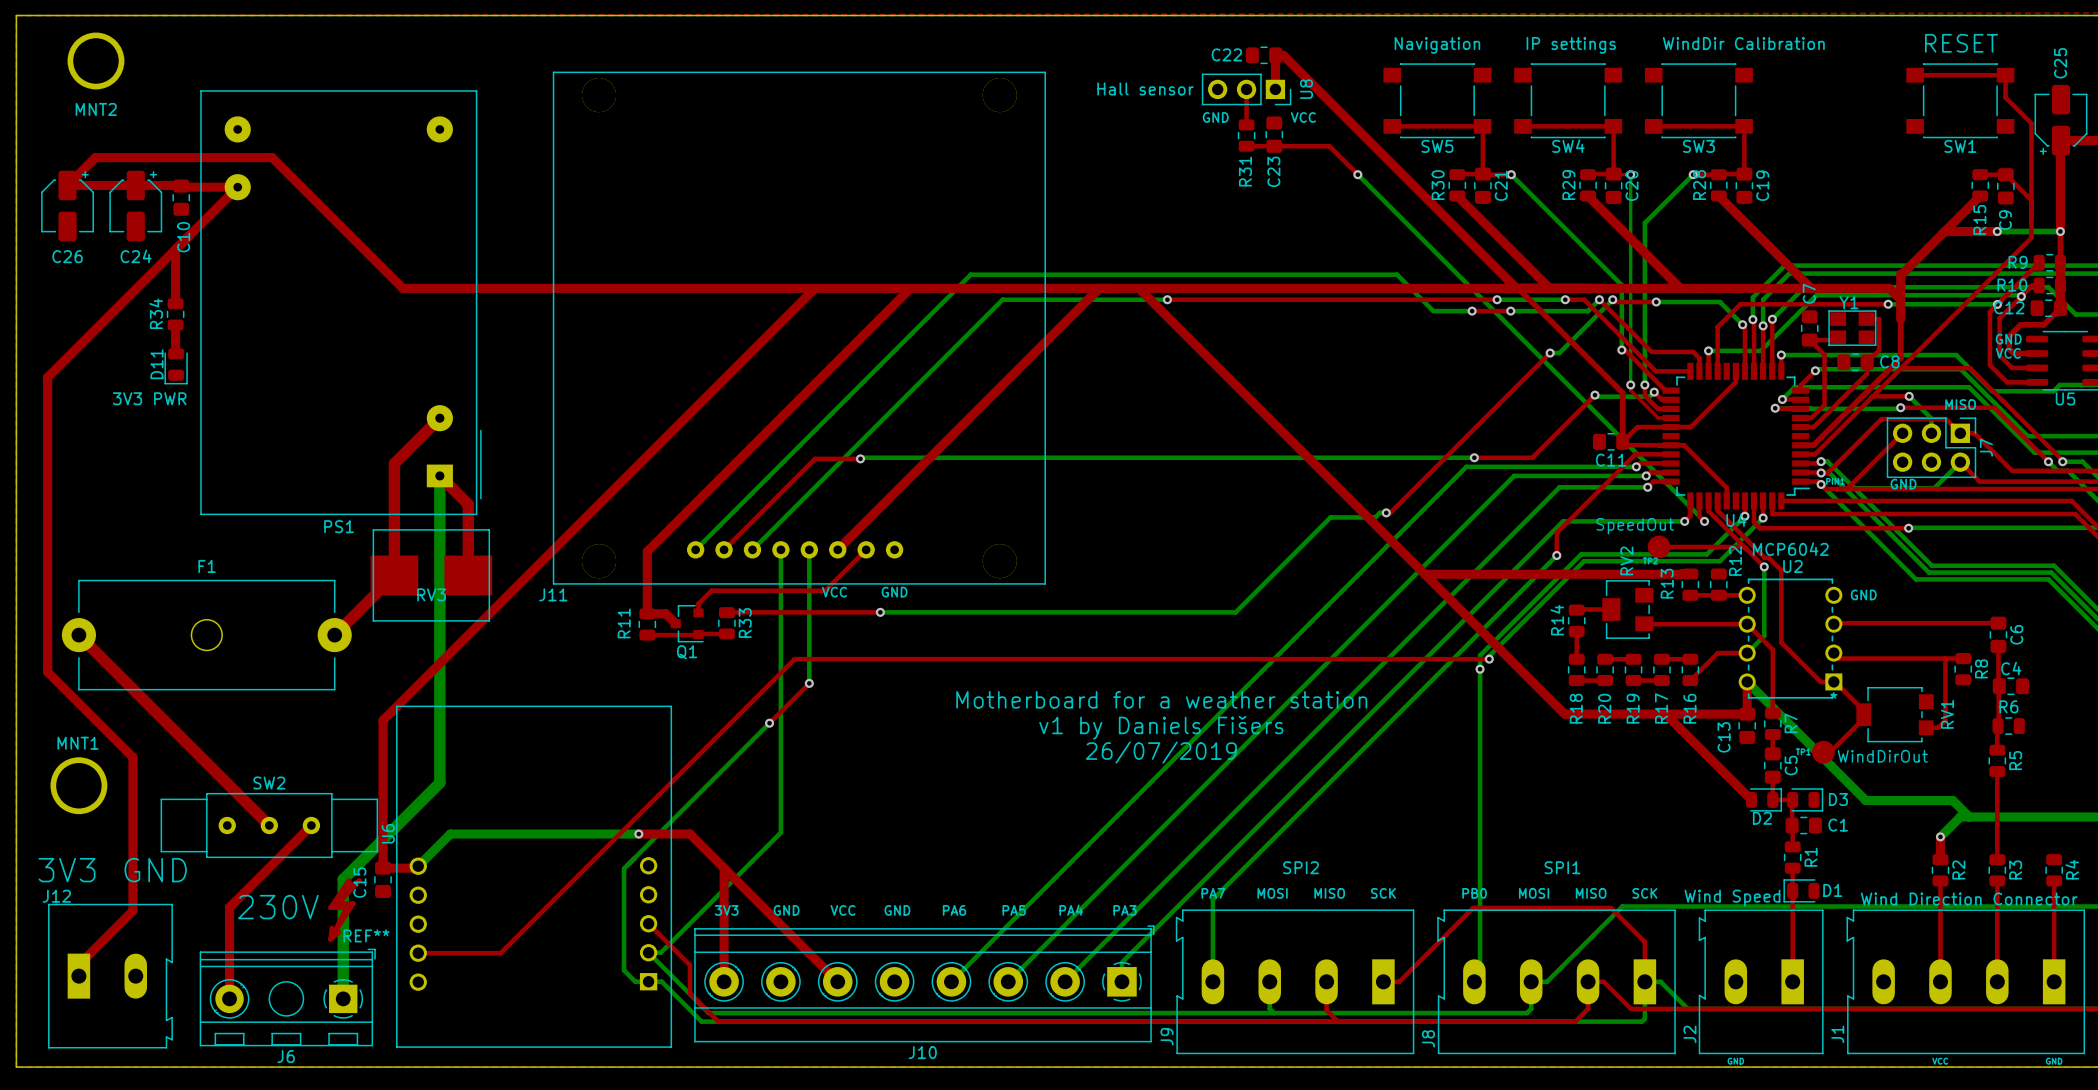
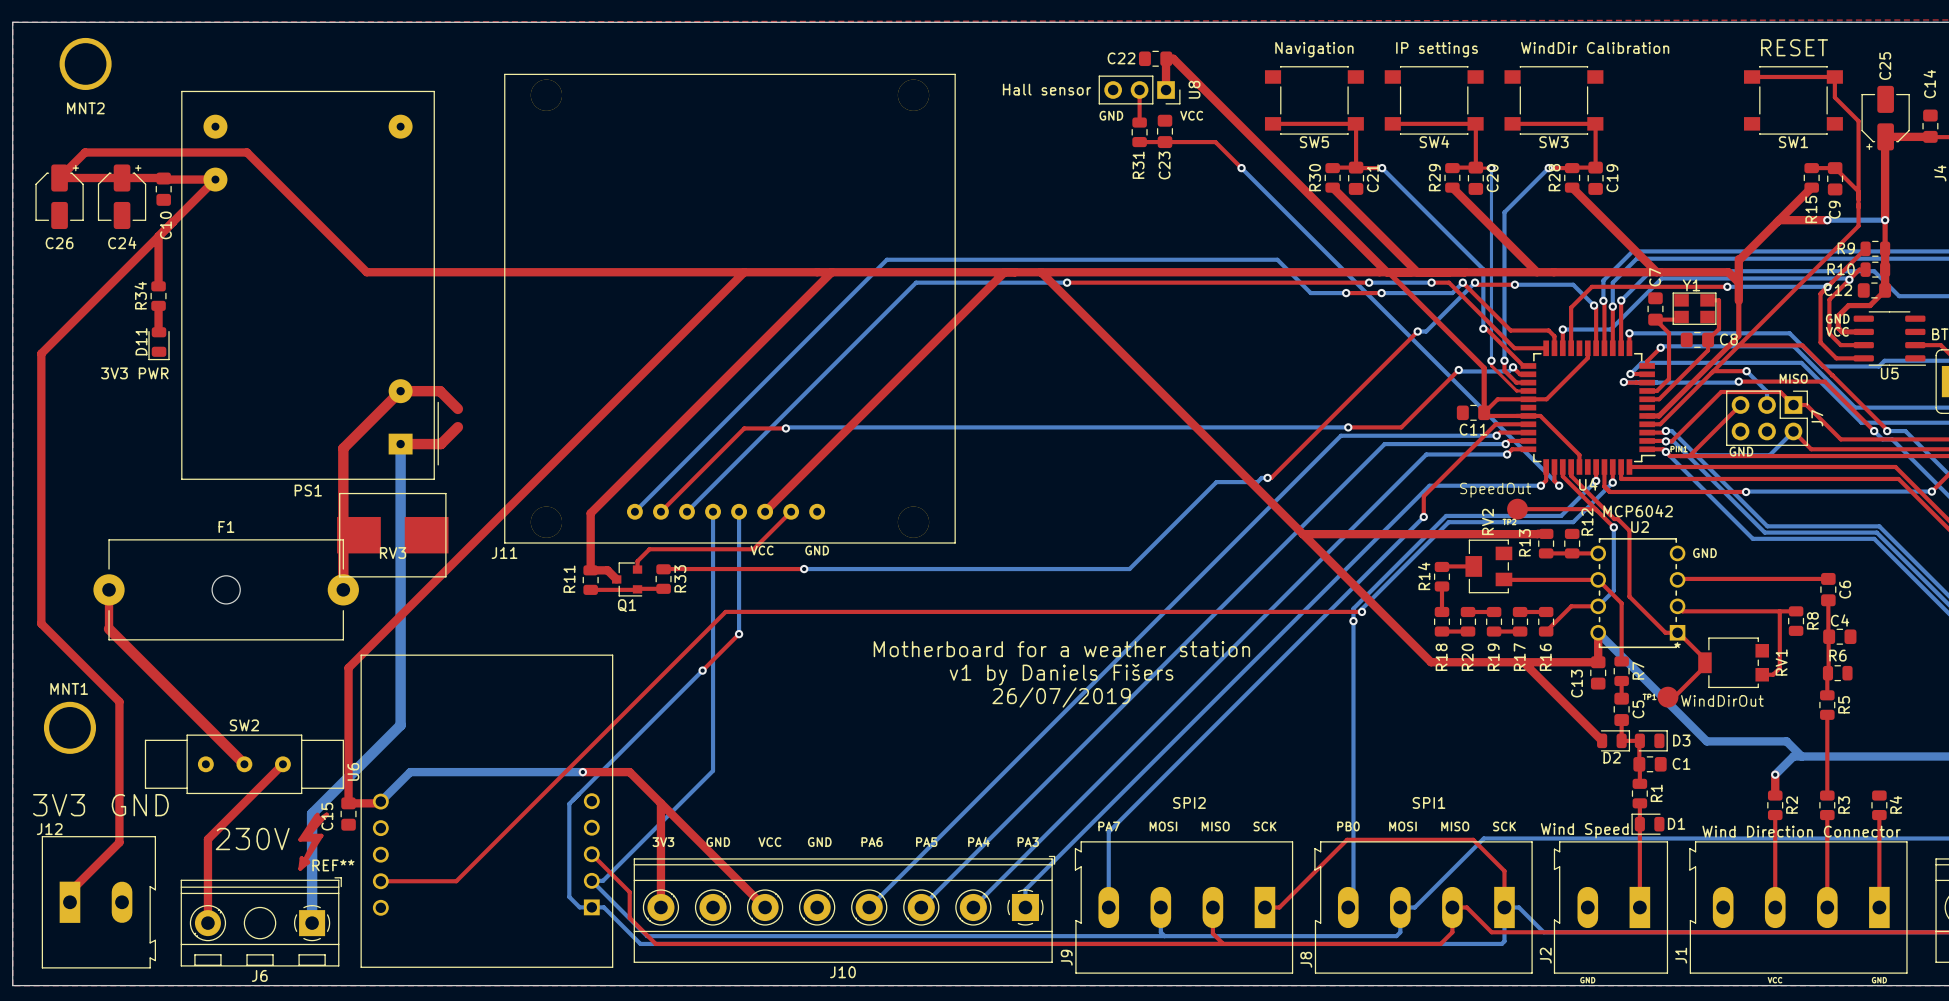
top track: none -> (400, 391) (440, 391) (457, 408)
top track: (394, 463) (394, 575) (334, 635) -> (358, 432) (343, 448) (343, 589)
top track: (439, 475) (468, 504) (468, 575) -> (400, 444) (440, 444) (457, 427)
top track: (78, 635) (121, 677) -> (109, 589) (109, 628)
F1 position: (206, 635) -> (226, 589)

